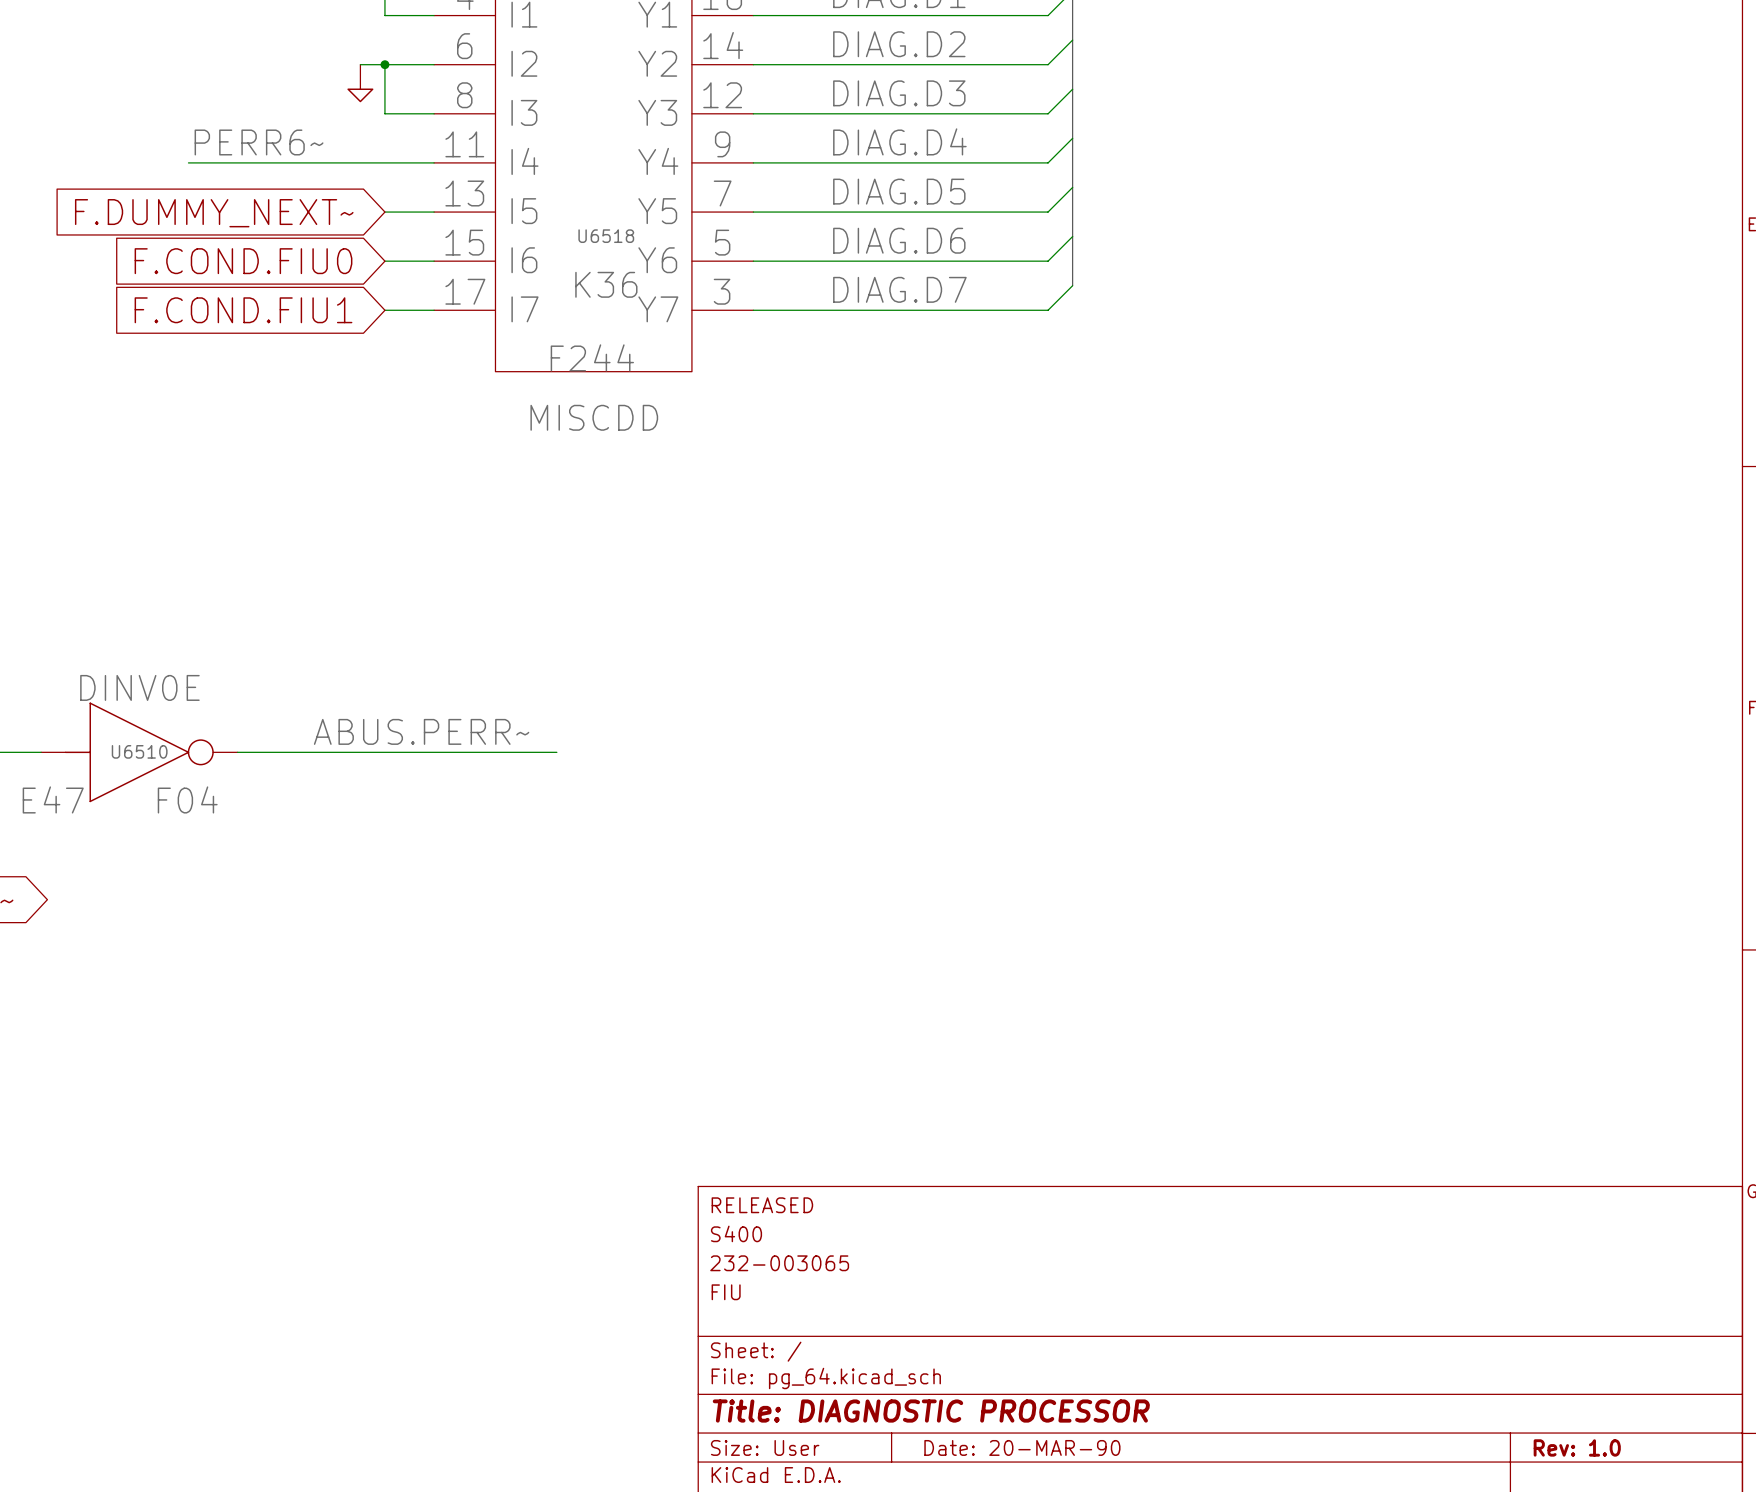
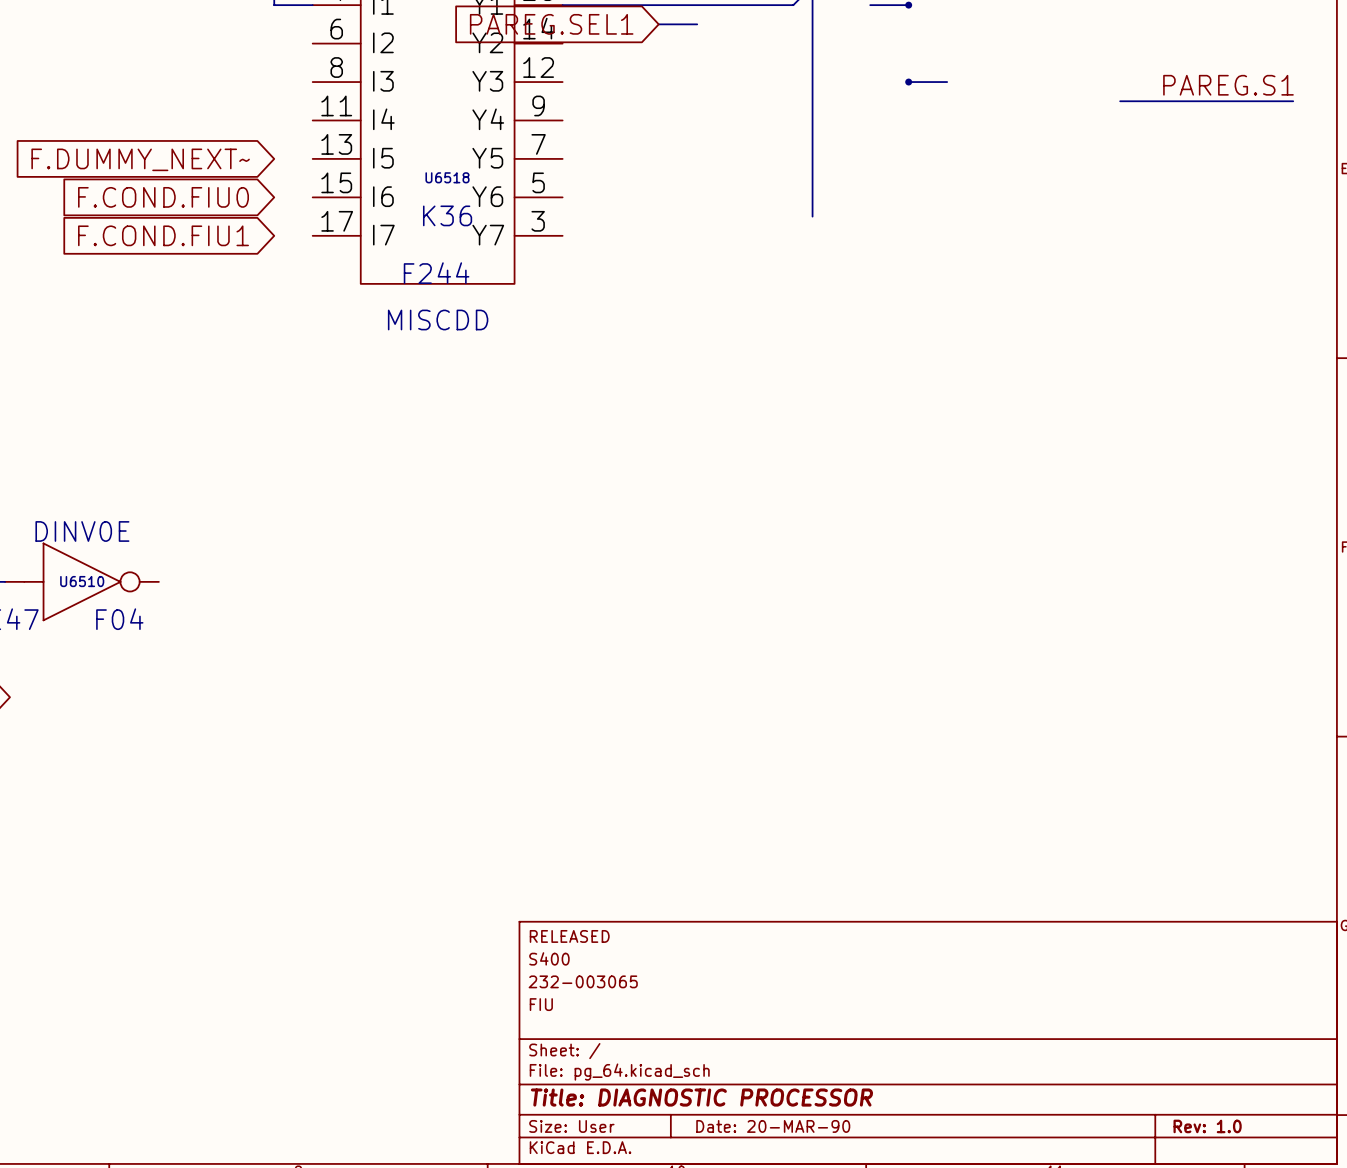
wire: none -> (870, 5) (908, 5)
junction: none -> (908, 5)
global label: none -> PAREG.SEL1 (551, 24)
wire: none -> (658, 24) (697, 24)
wire: (1072, 40) (1048, 64) (753, 64) -> none
label: DIAG.D2 (899, 44) -> none
wire: (360, 64) (434, 64) -> none
wire: (384, 64) (384, 113) (434, 113) -> none
junction: (384, 64) -> none
power symbol: (360, 83) -> none
wire: (1072, 89) (1048, 113) (753, 113) -> none
label: DIAG.D3 (899, 93) -> none
wire: none -> (908, 82) (947, 82)
junction: none -> (908, 82)
label: none -> PAREG.S1 (1228, 85)
wire: (1072, 138) (1048, 162) (753, 162) -> none
wire: none -> (1120, 101) (1293, 101)
label: DIAG.D4 (899, 141) -> none
label: PERR6~ (259, 142) -> none
wire: (188, 162) (434, 162) -> none
wire: (1072, 187) (1048, 212) (753, 212) -> none
label: DIAG.D5 (899, 191) -> none
wire: (384, 212) (434, 212) -> none
wire: (1072, 236) (1048, 261) (753, 261) -> none
label: DIAG.D6 (899, 240) -> none
wire: (384, 261) (434, 261) -> none
wire: (1072, 285) (1048, 310) (753, 310) -> none
label: DIAG.D7 (899, 289) -> none
wire: (384, 310) (434, 310) -> none
label: ABUS.PERR~ (421, 731) -> none
wire: (237, 752) (556, 752) -> none

